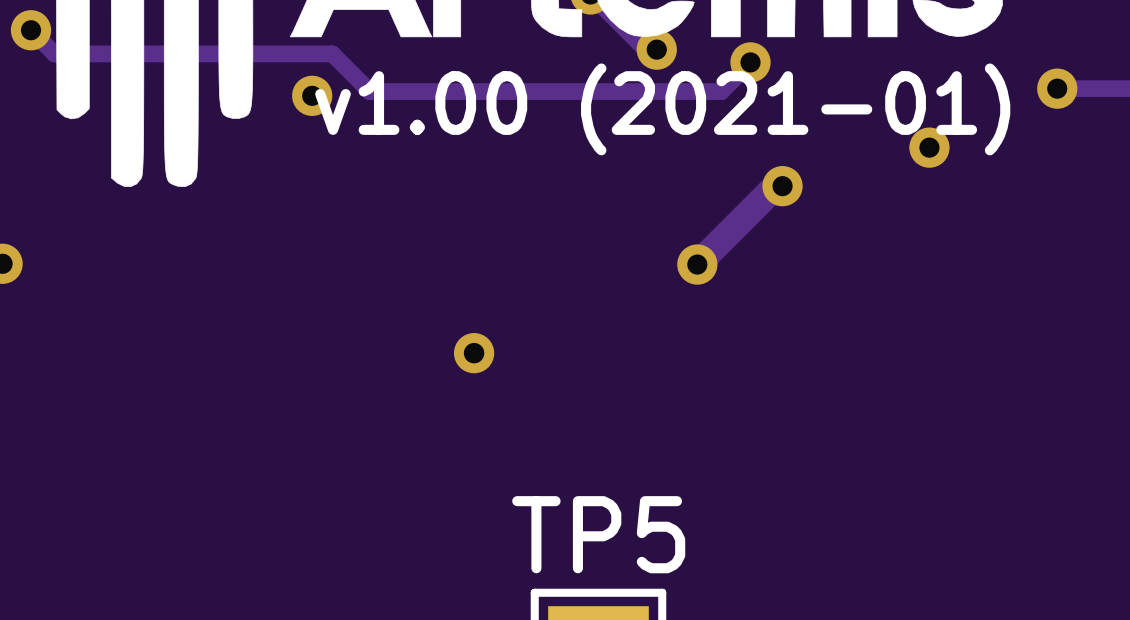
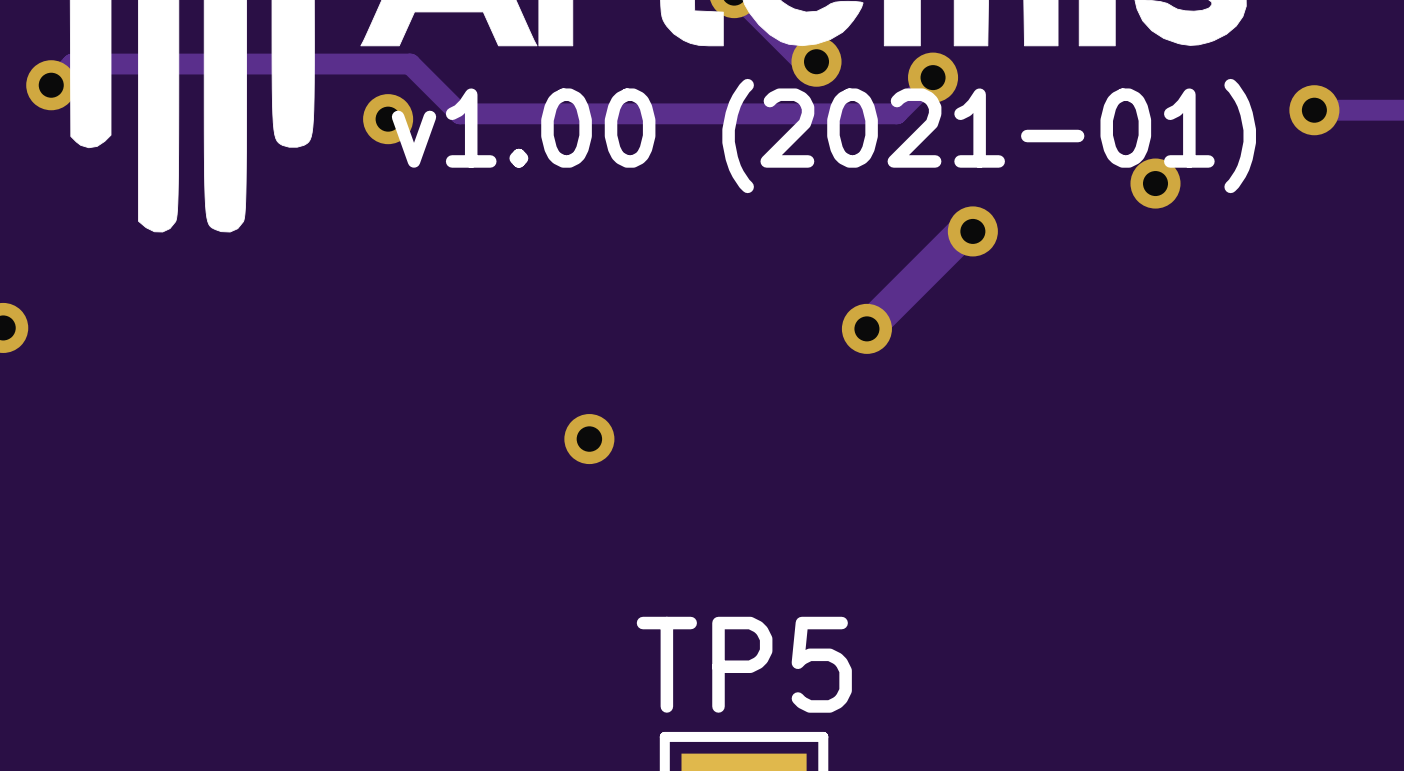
track: (31, 30) (54, 53) (332, 53) -> (51, 85) (72, 64) (410, 64) (413, 67)
via position: (31, 30) -> (51, 85)

